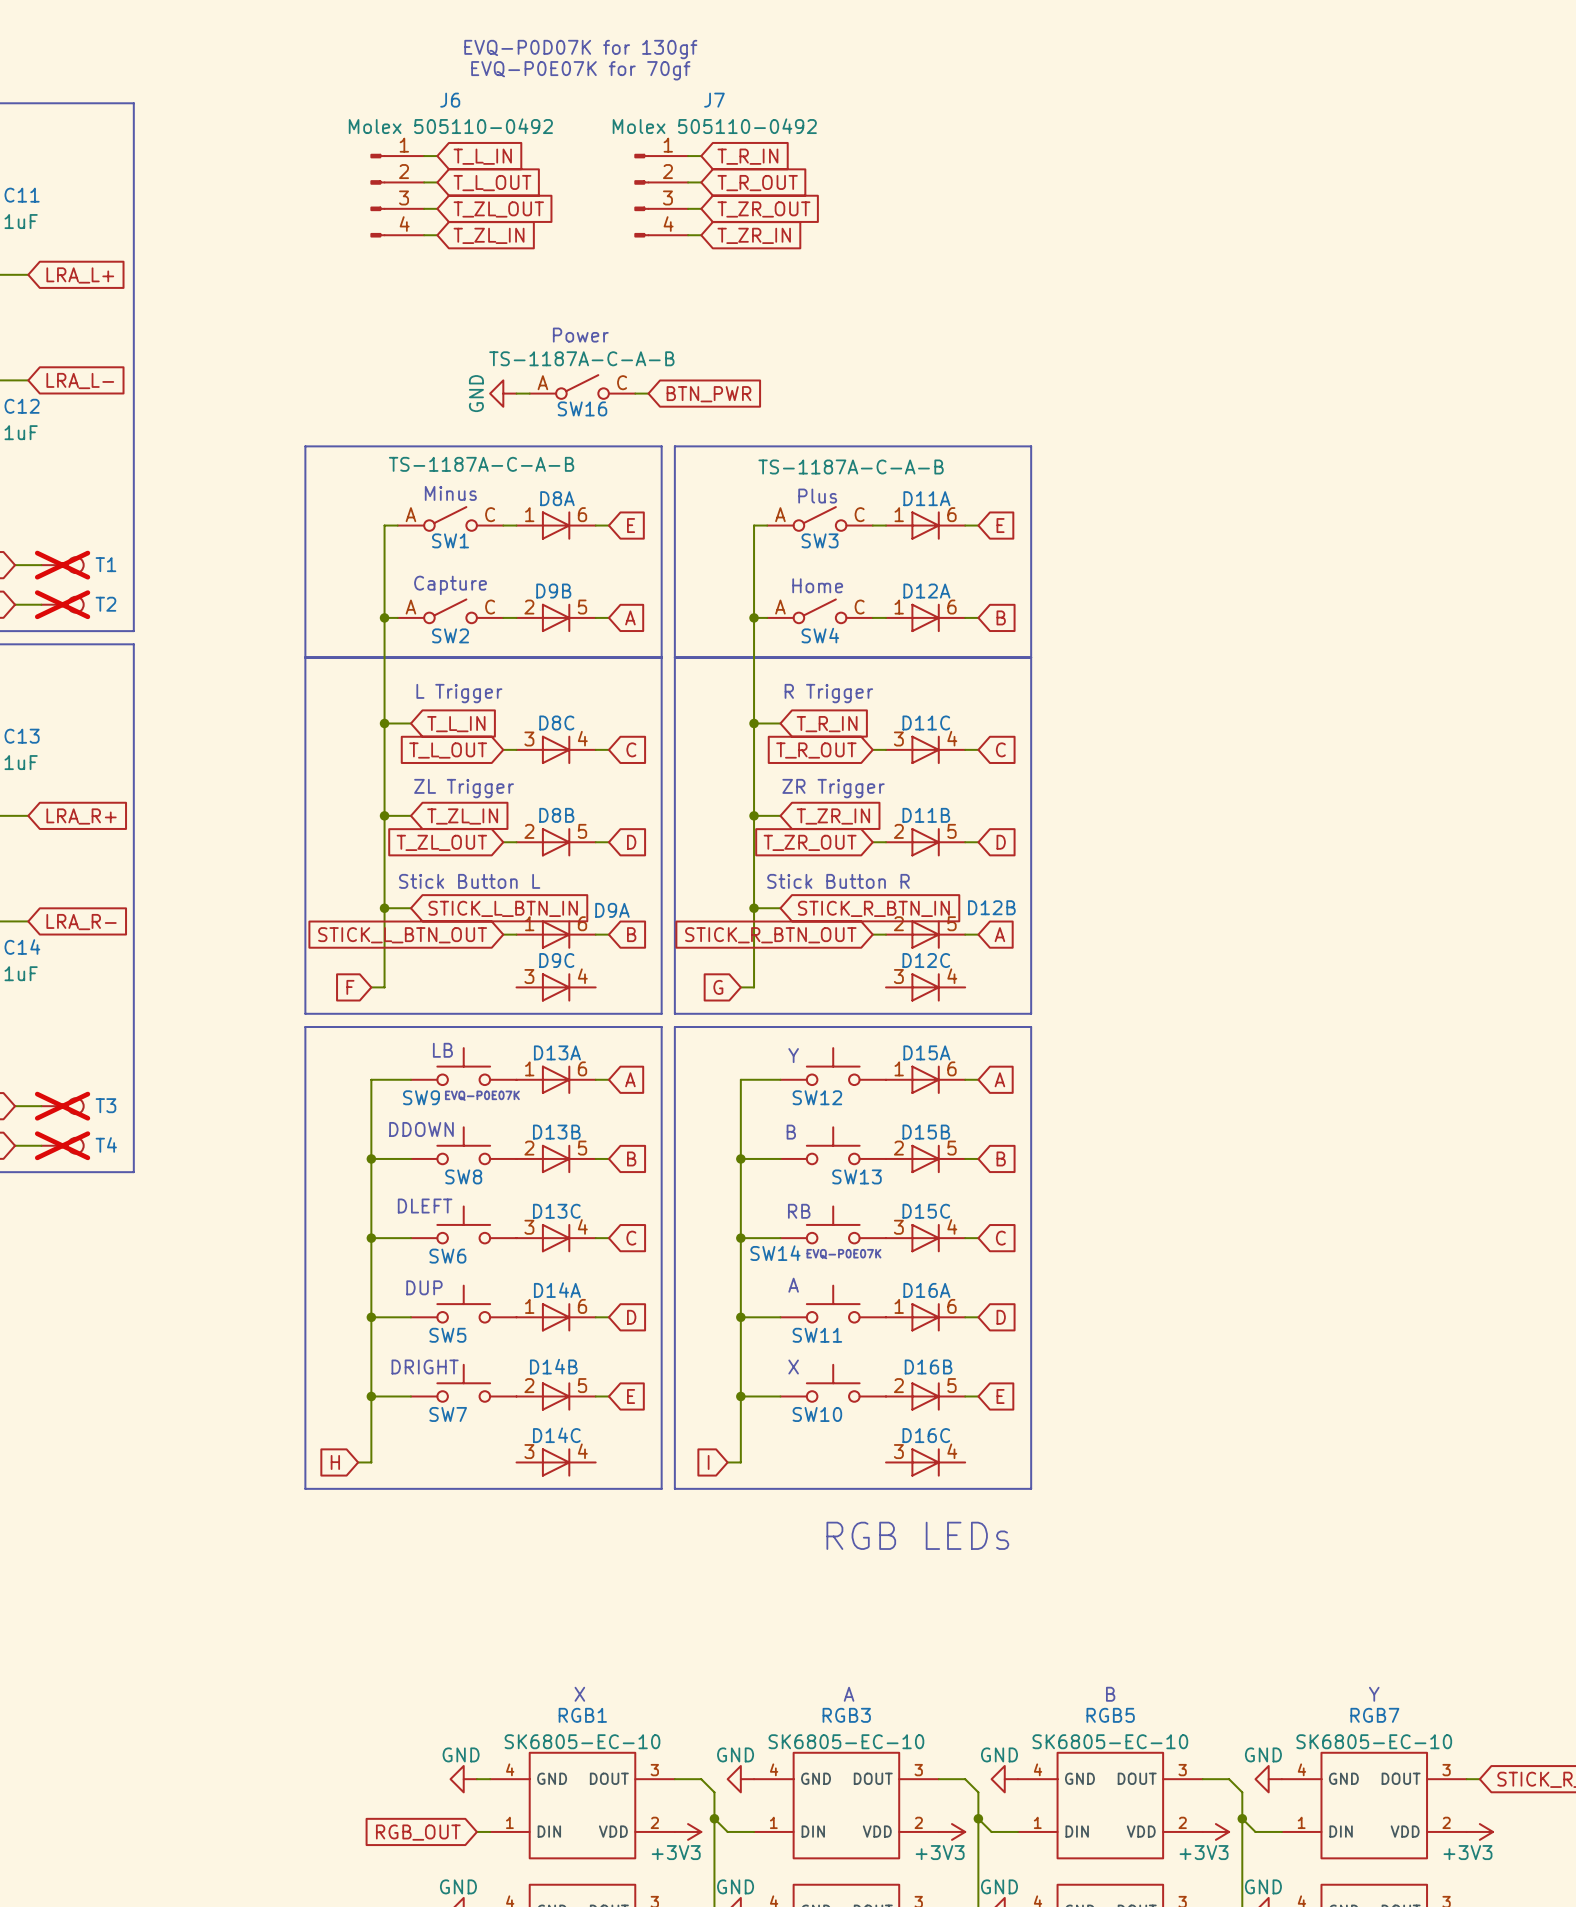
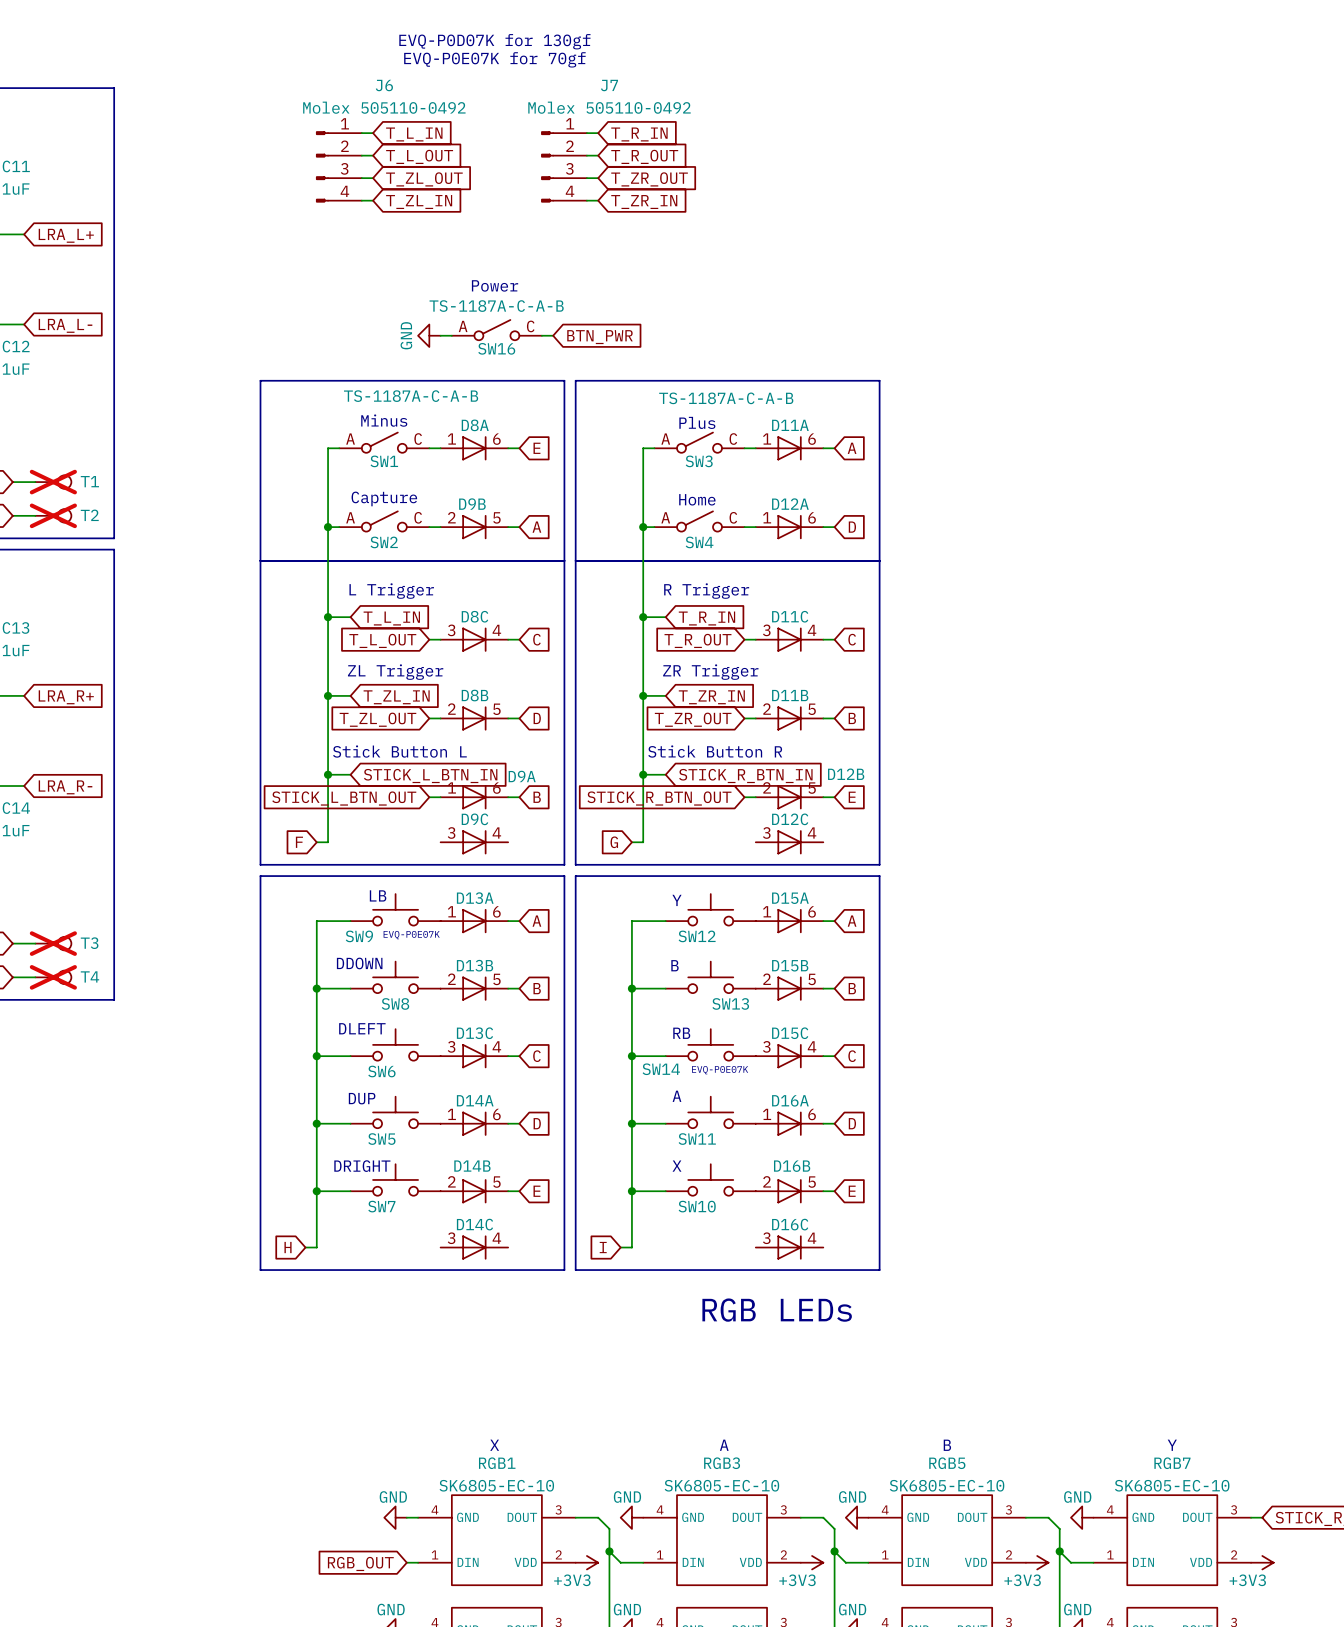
global label: E (1000, 525) -> A (852, 448)
global label: B (1001, 617) -> D (852, 527)
global label: D (1001, 842) -> B (852, 718)
global label: A (999, 934) -> E (852, 797)

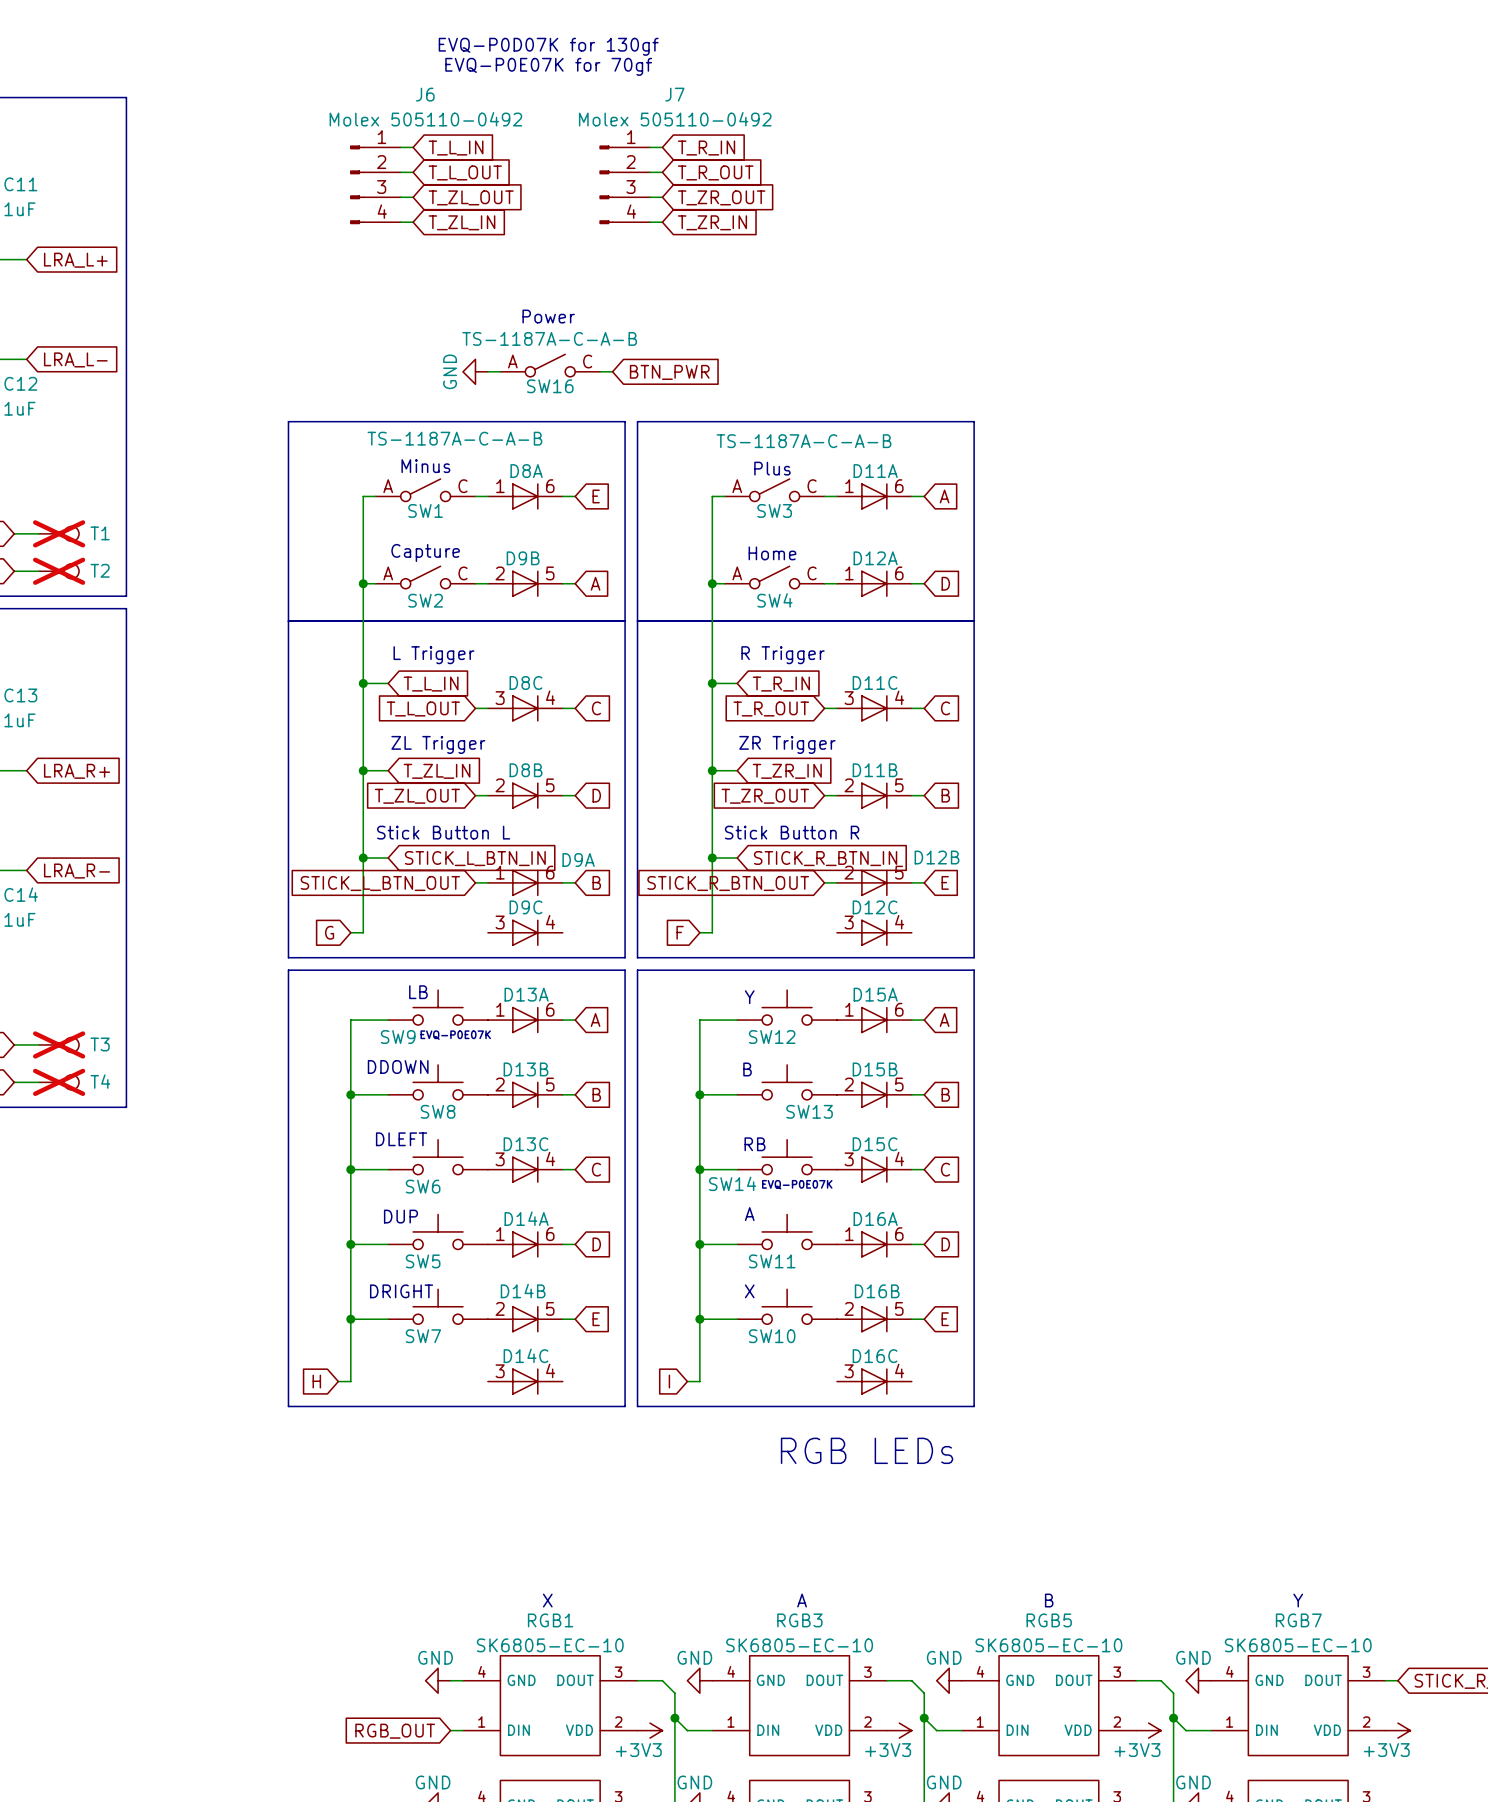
global label: F (299, 842) -> G (329, 932)
global label: G (614, 842) -> F (680, 932)

